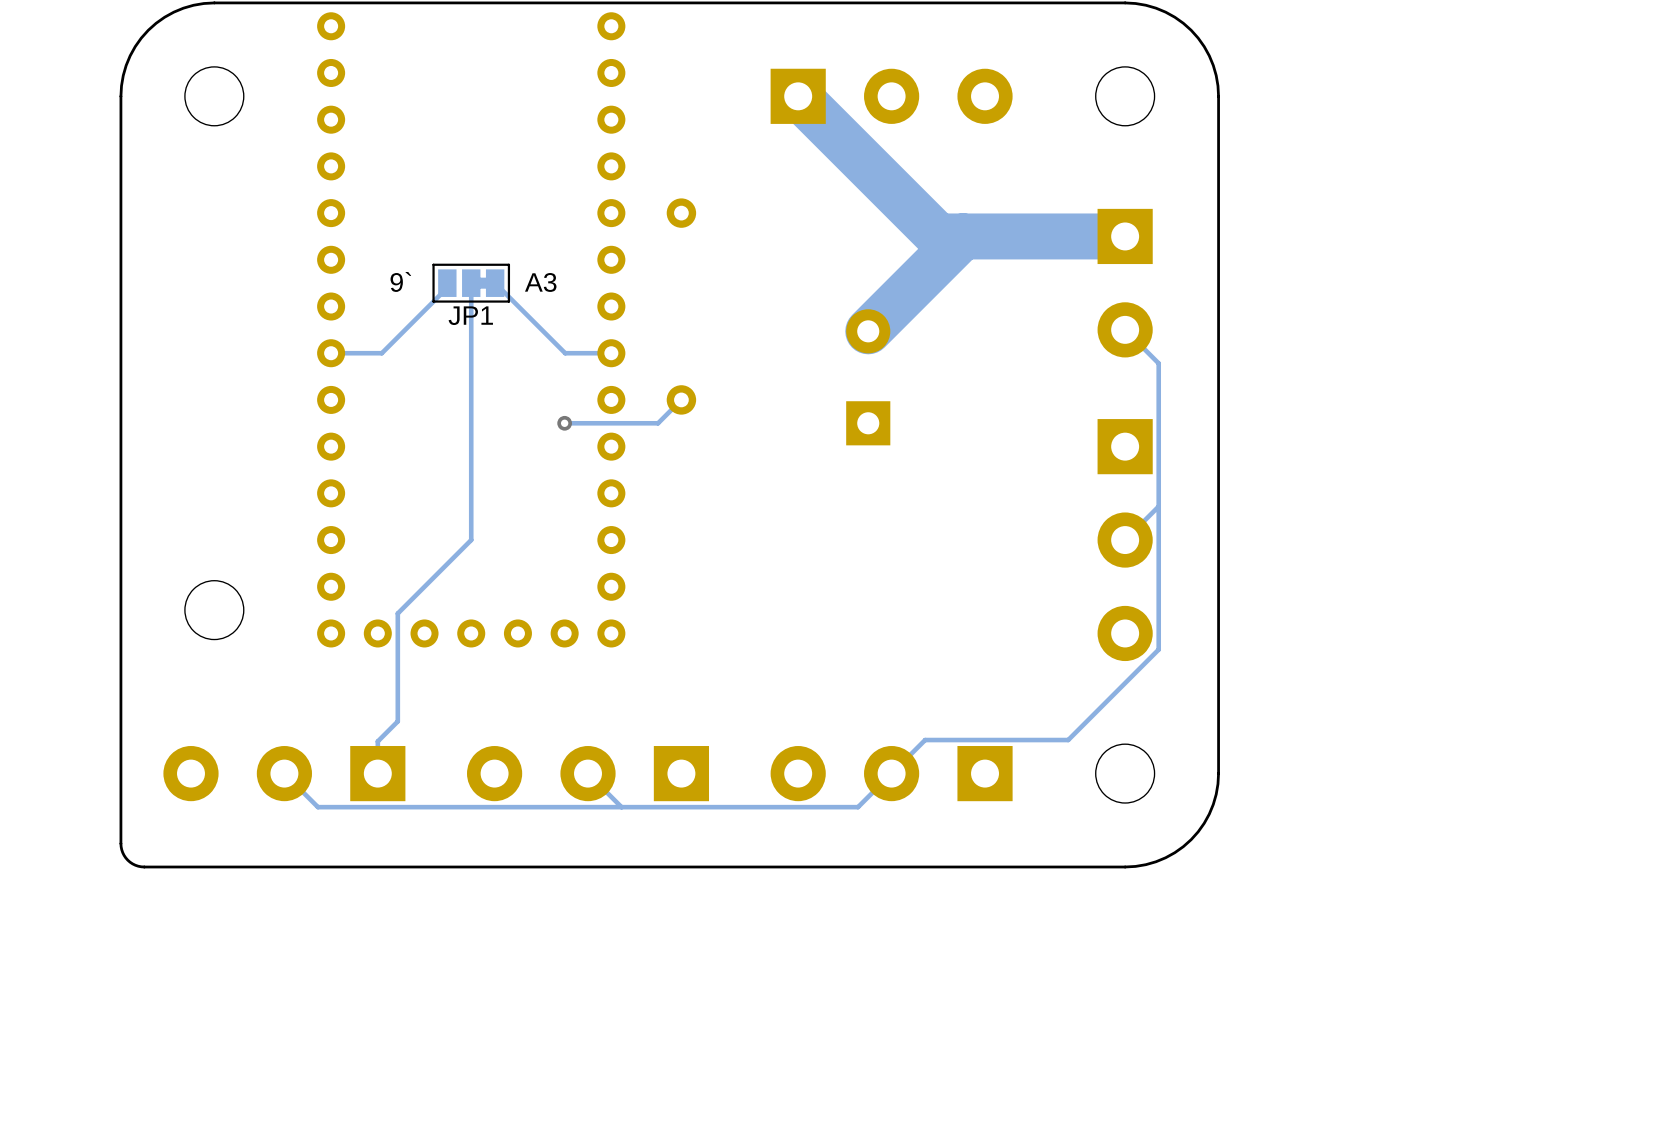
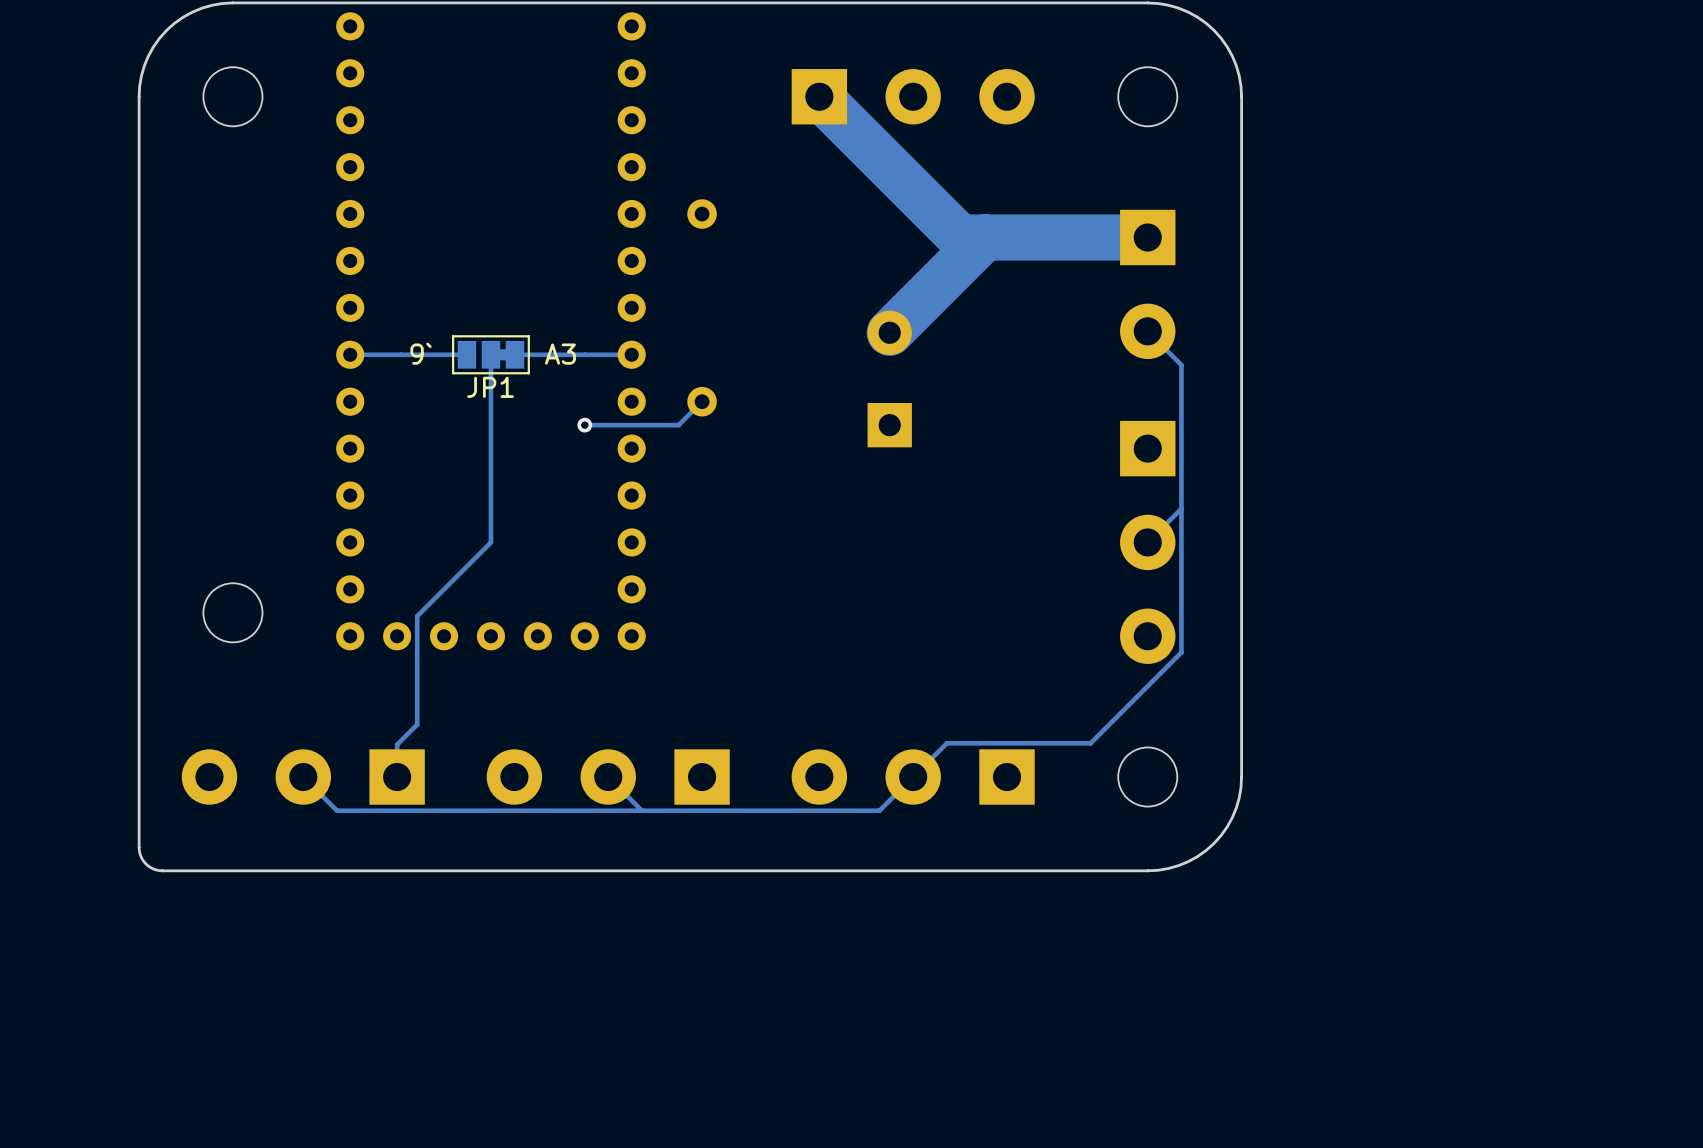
track: (447, 283) (447, 287) (381, 353) -> (466, 354) (401, 354)
track: (471, 283) (471, 353) -> none
JP1 position: (471, 283) -> (490, 354)
track: (495, 283) (565, 353) -> (514, 354) (585, 354)

